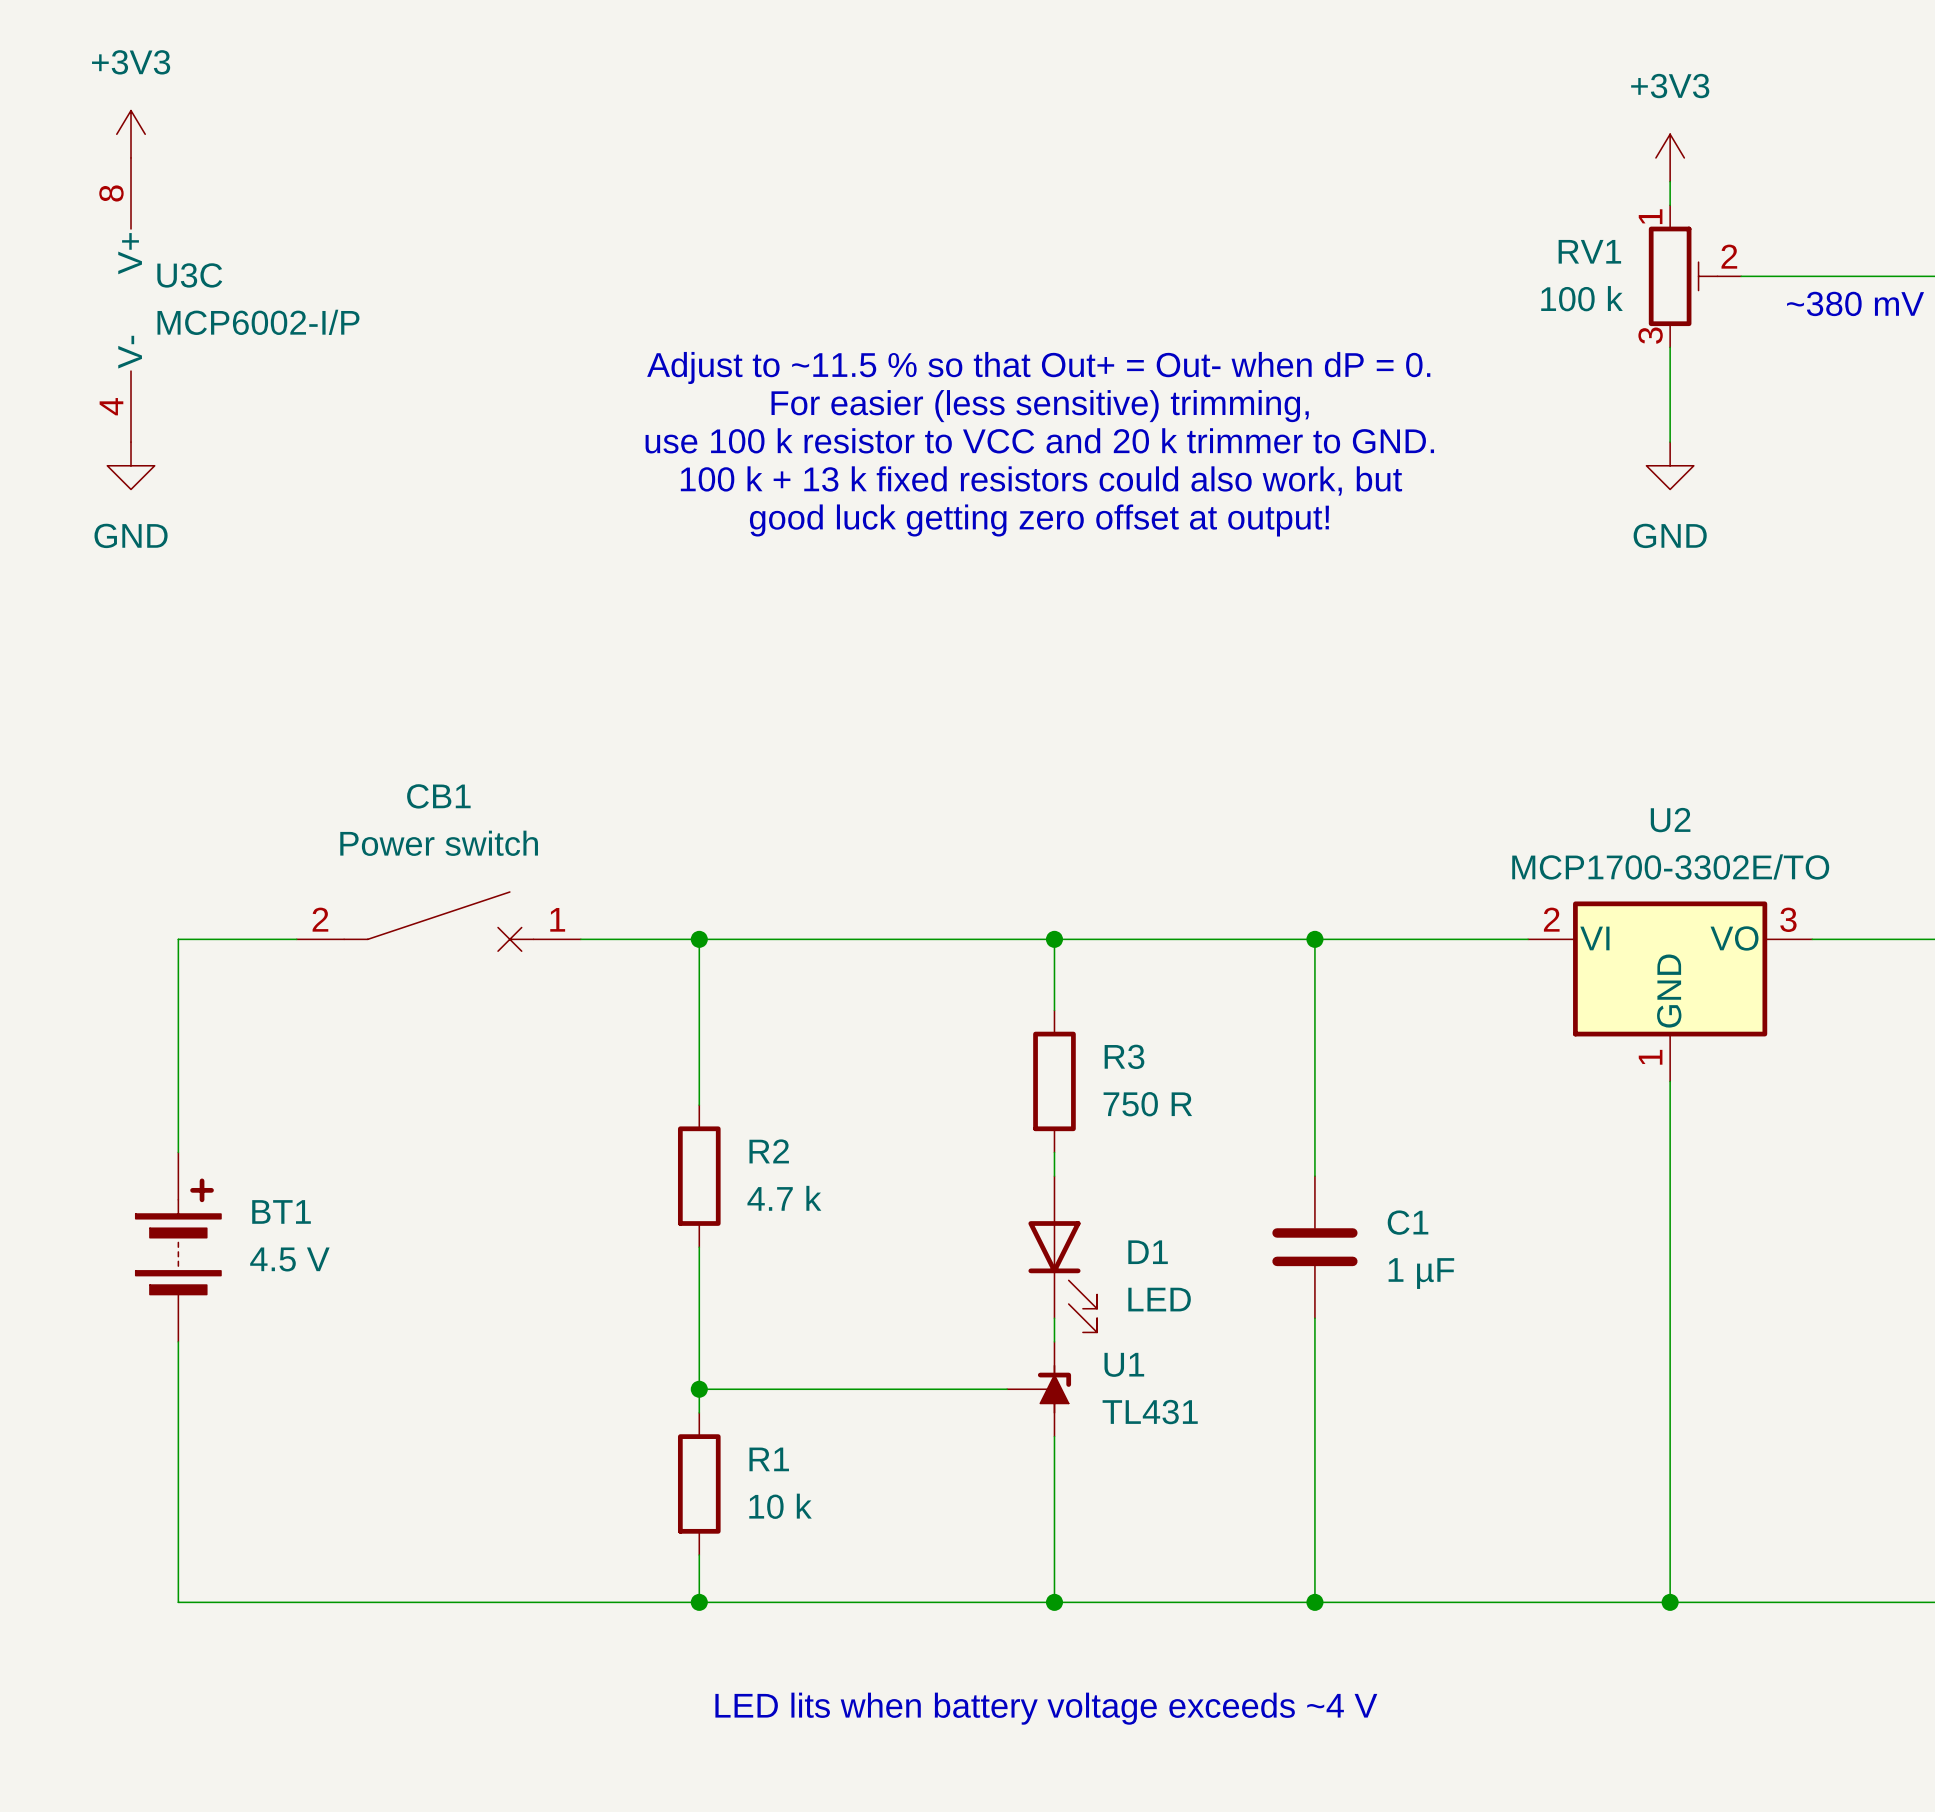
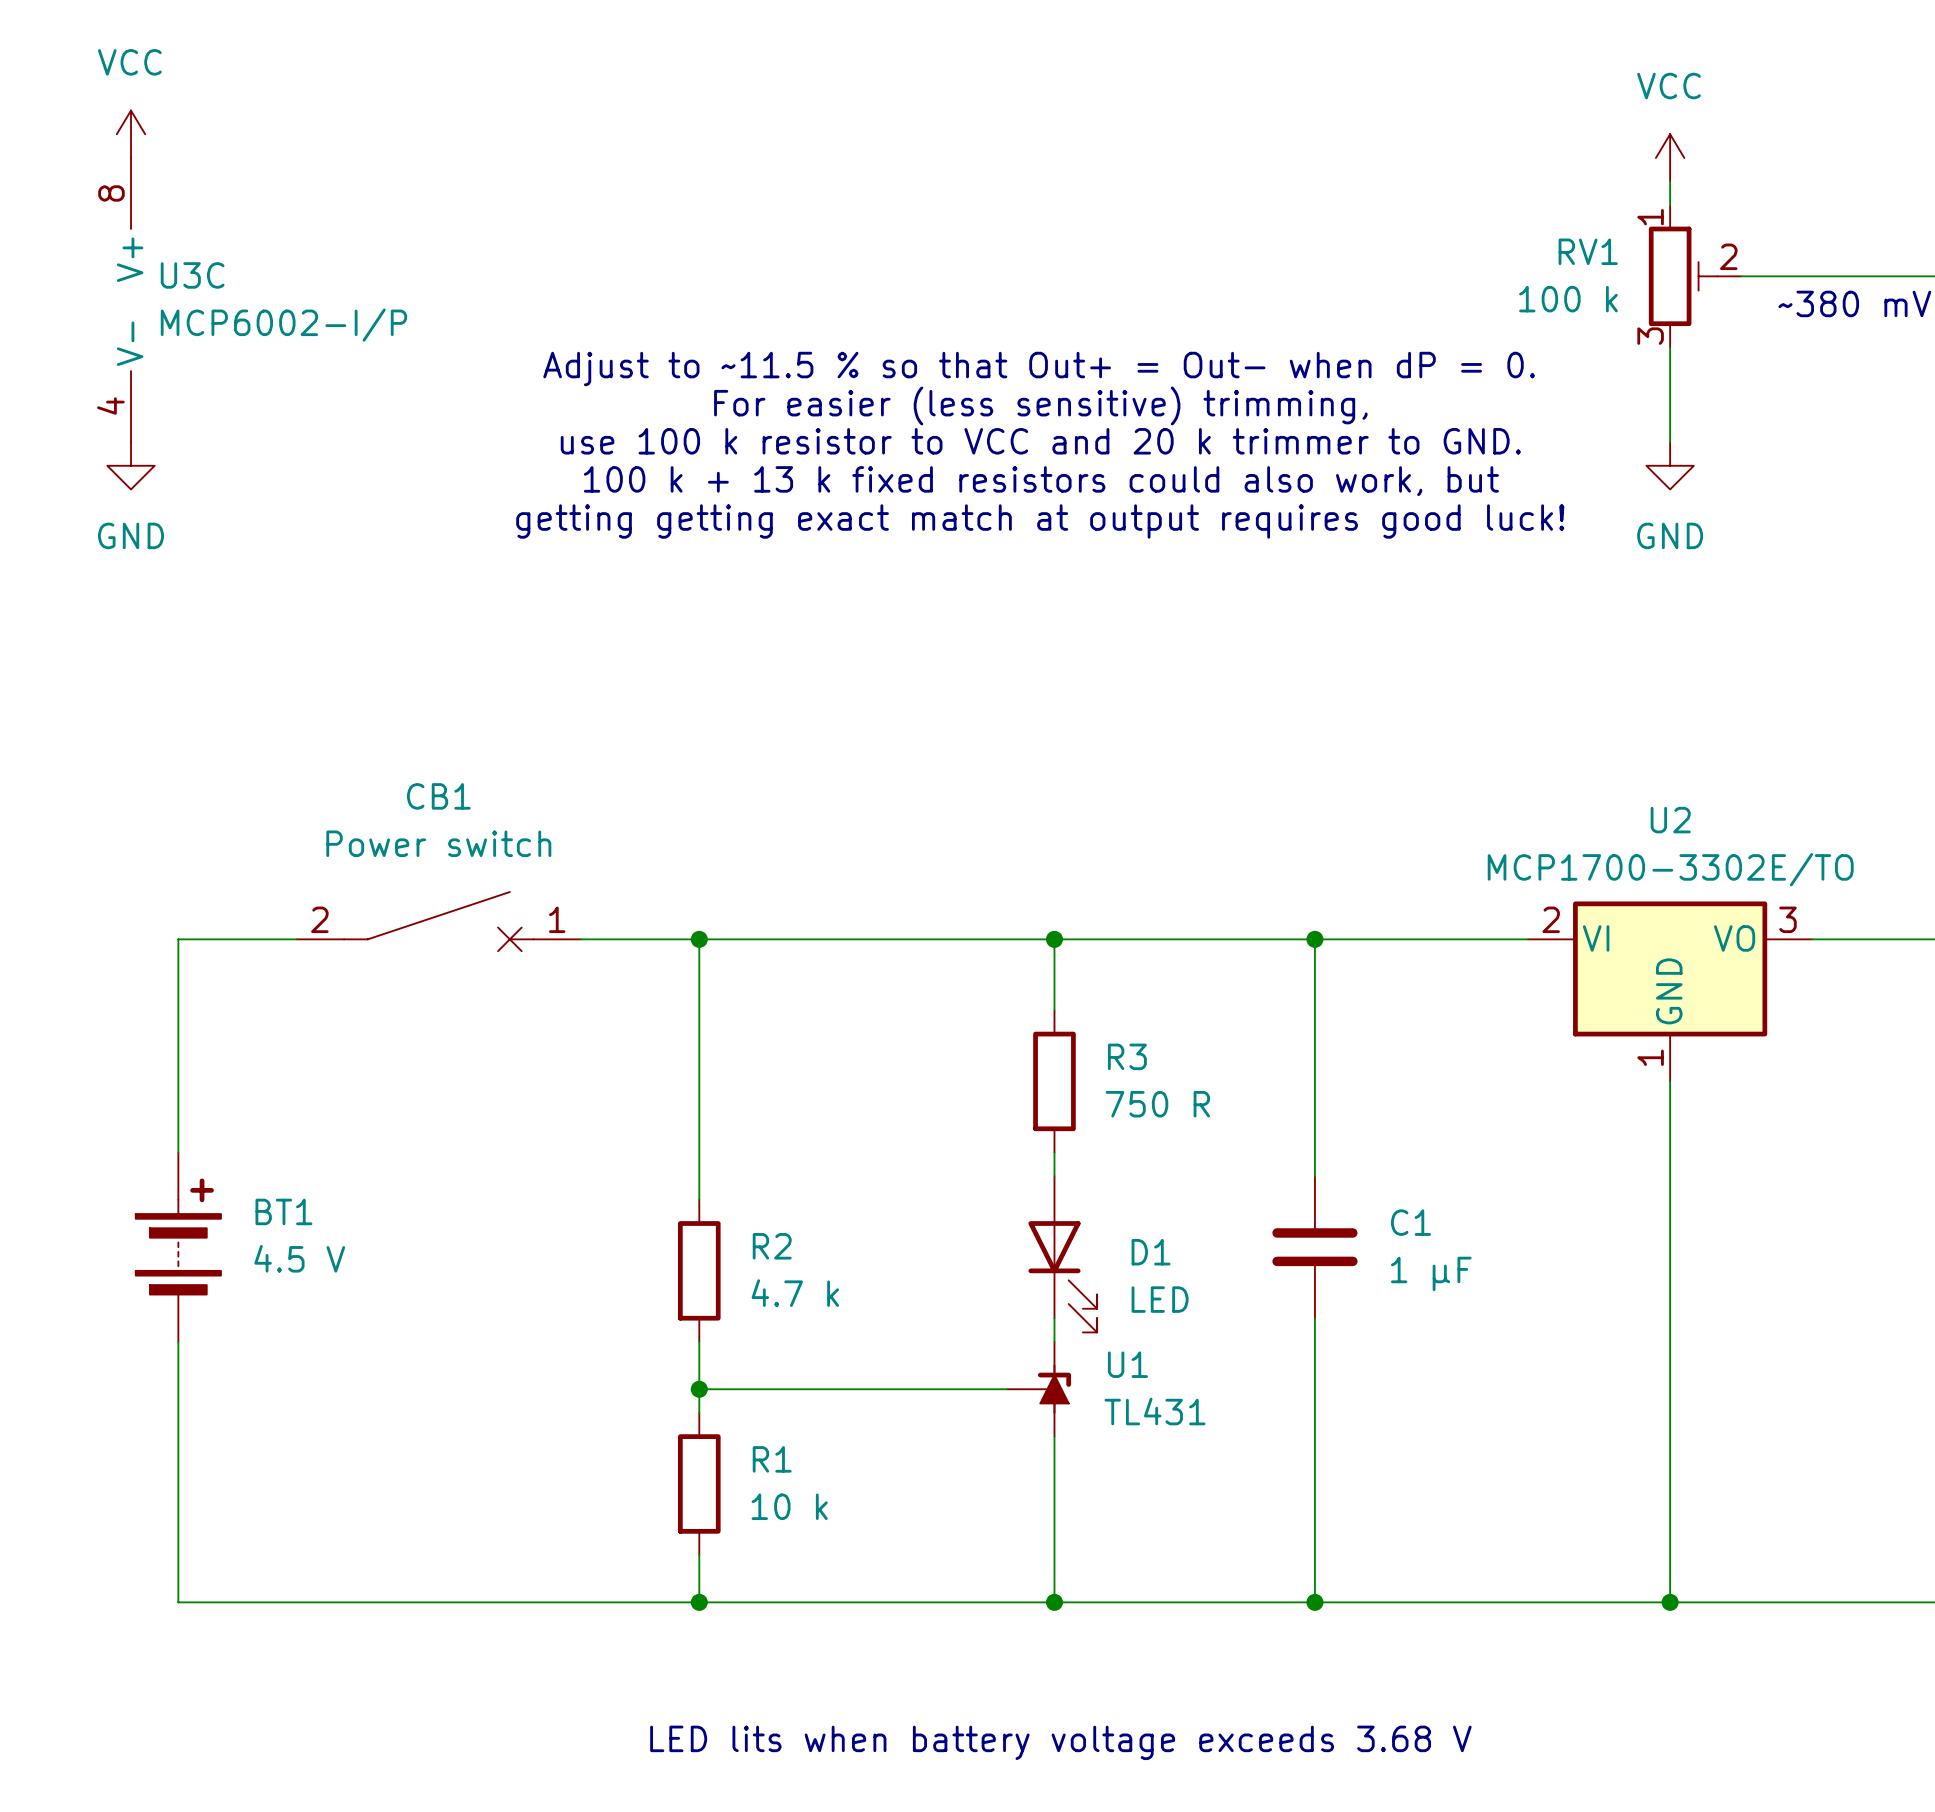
power symbol: +3V3 (131, 134) -> VCC (131, 134)
power symbol: +3V3 (1670, 157) -> VCC (1670, 157)
text: good luck getting zero offset at output! (1039, 520) -> getting getting exact match at output requires good luck! (1040, 521)
R2 position: (699, 1176) -> (699, 1270)
wire: (699, 1247) (699, 1341) -> (699, 1105) (699, 1199)
text: LED lits when battery voltage exceeds ~4 V (1046, 1708) -> LED lits when battery voltage exceeds 3.68 V (1060, 1742)

